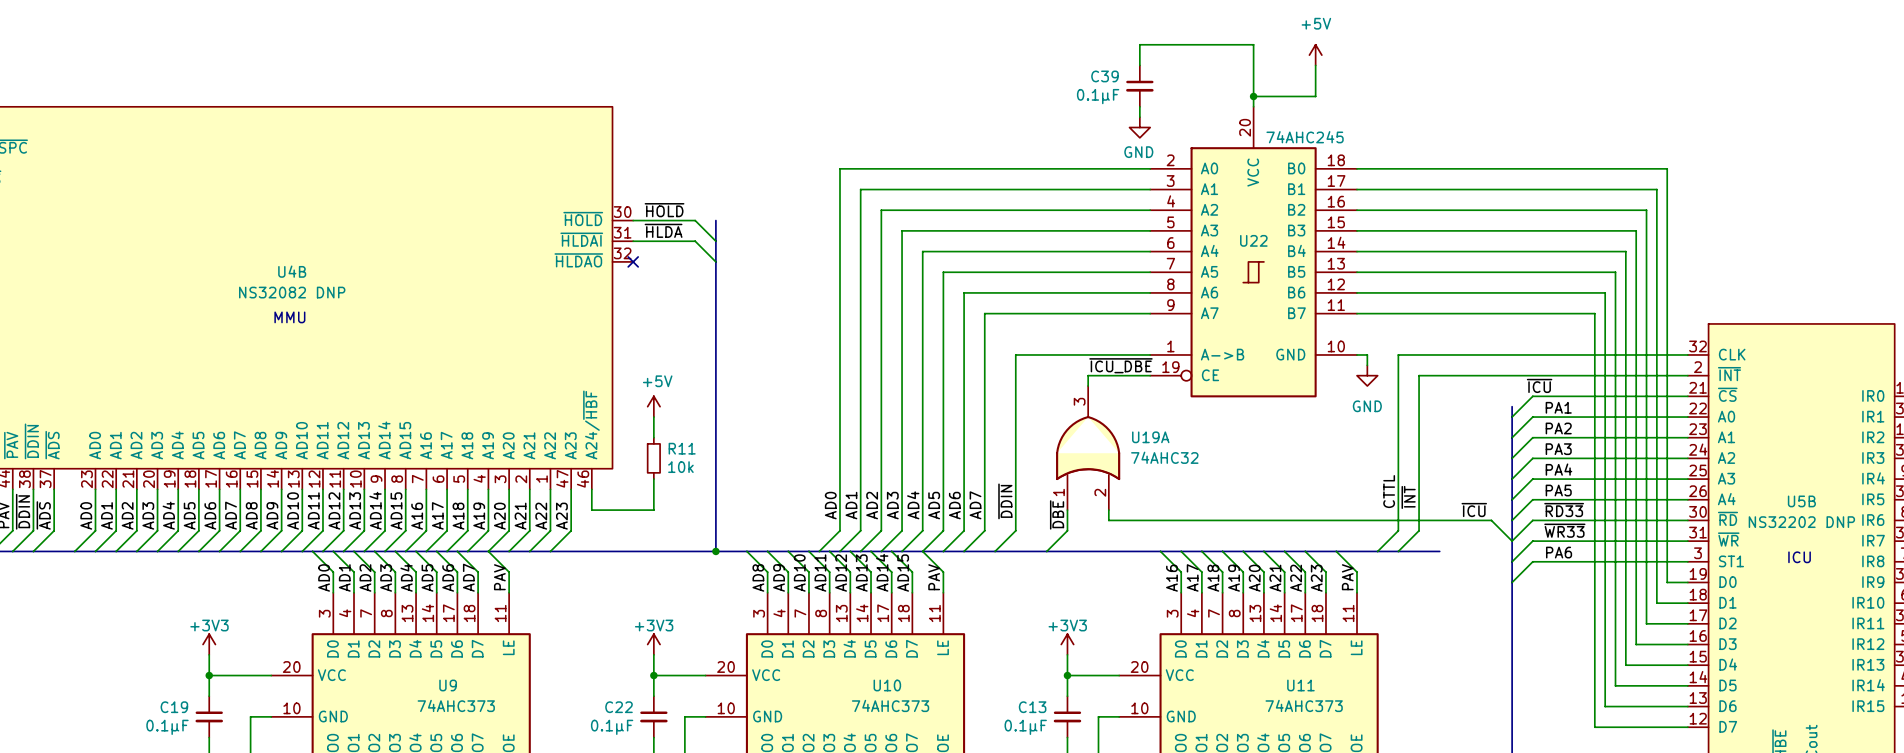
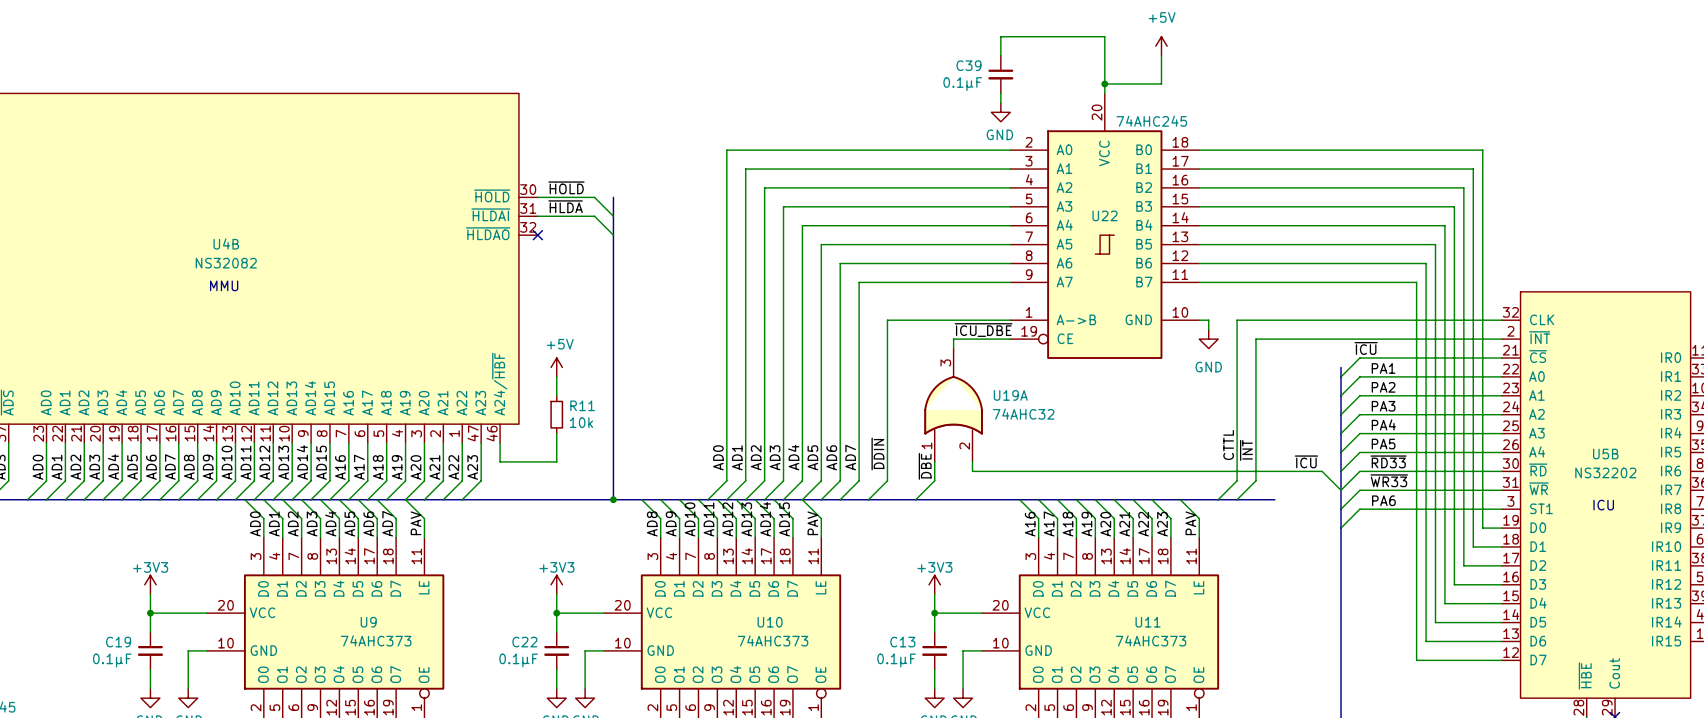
U4B value: NS32082 DNP (292, 292) -> NS32082 (226, 263)
U5B value: NS32202 DNP (1801, 522) -> NS32202 (1605, 472)

